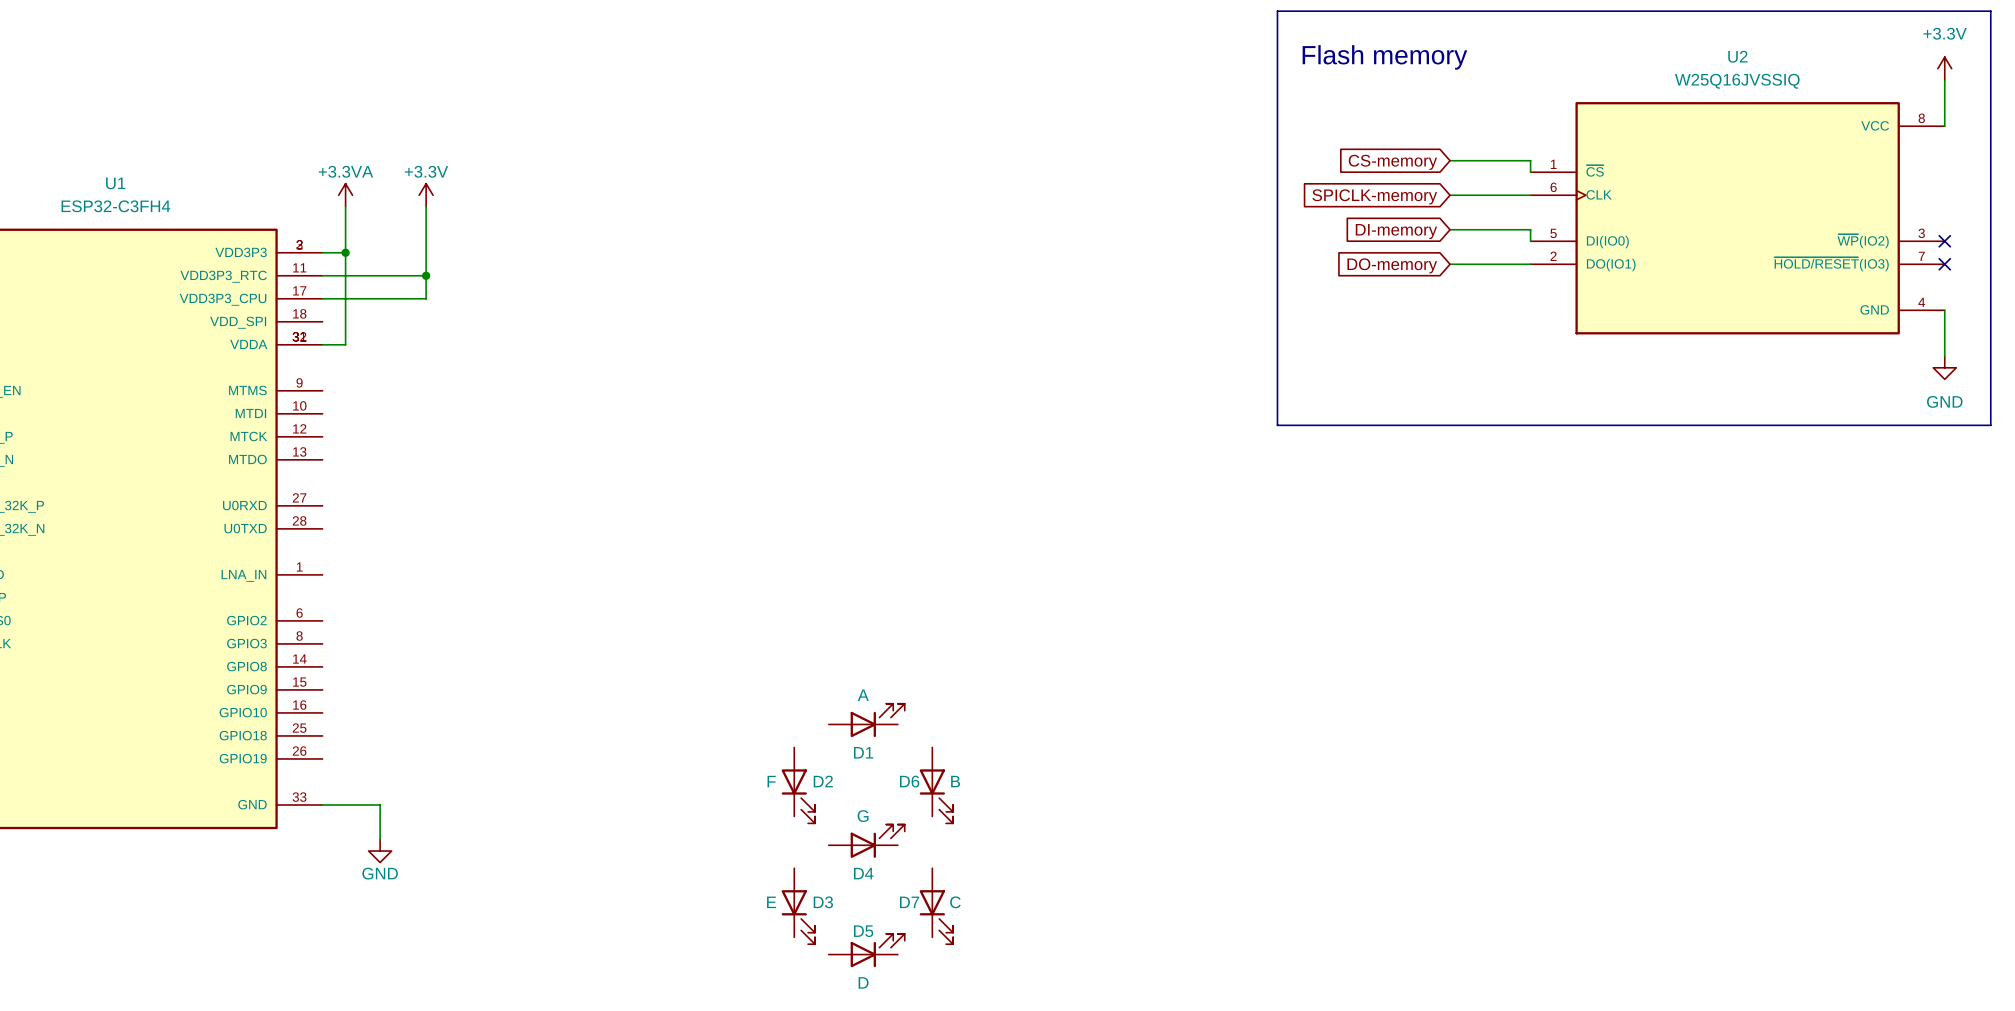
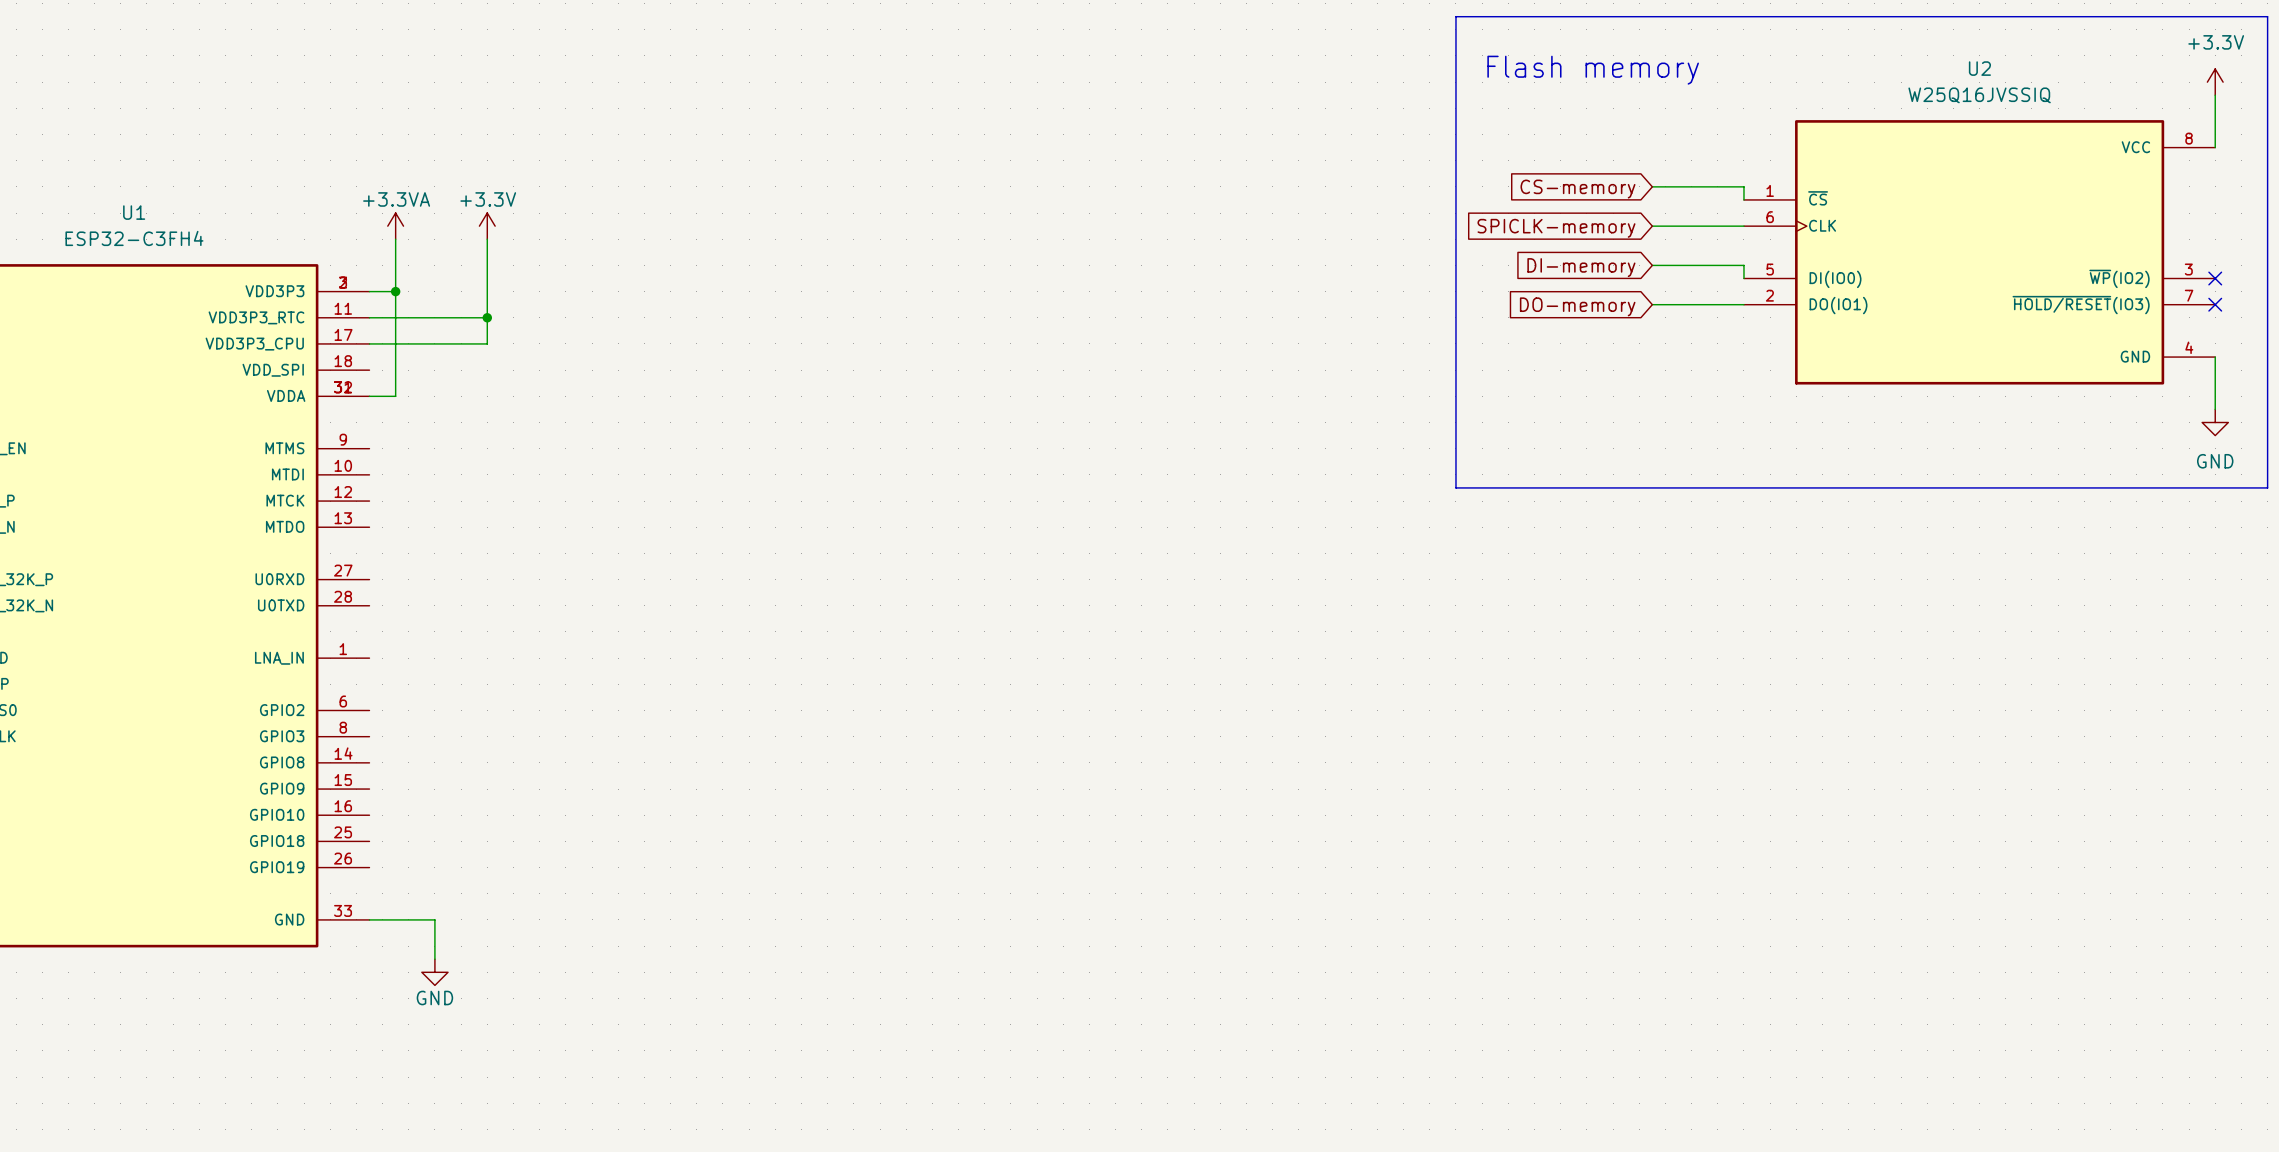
D1: A (866, 720) -> none
D2: F (798, 785) -> none
D6: B (936, 785) -> none
D4: G (866, 841) -> none
D3: E (798, 906) -> none
D7: C (936, 906) -> none
D5: D (866, 950) -> none

